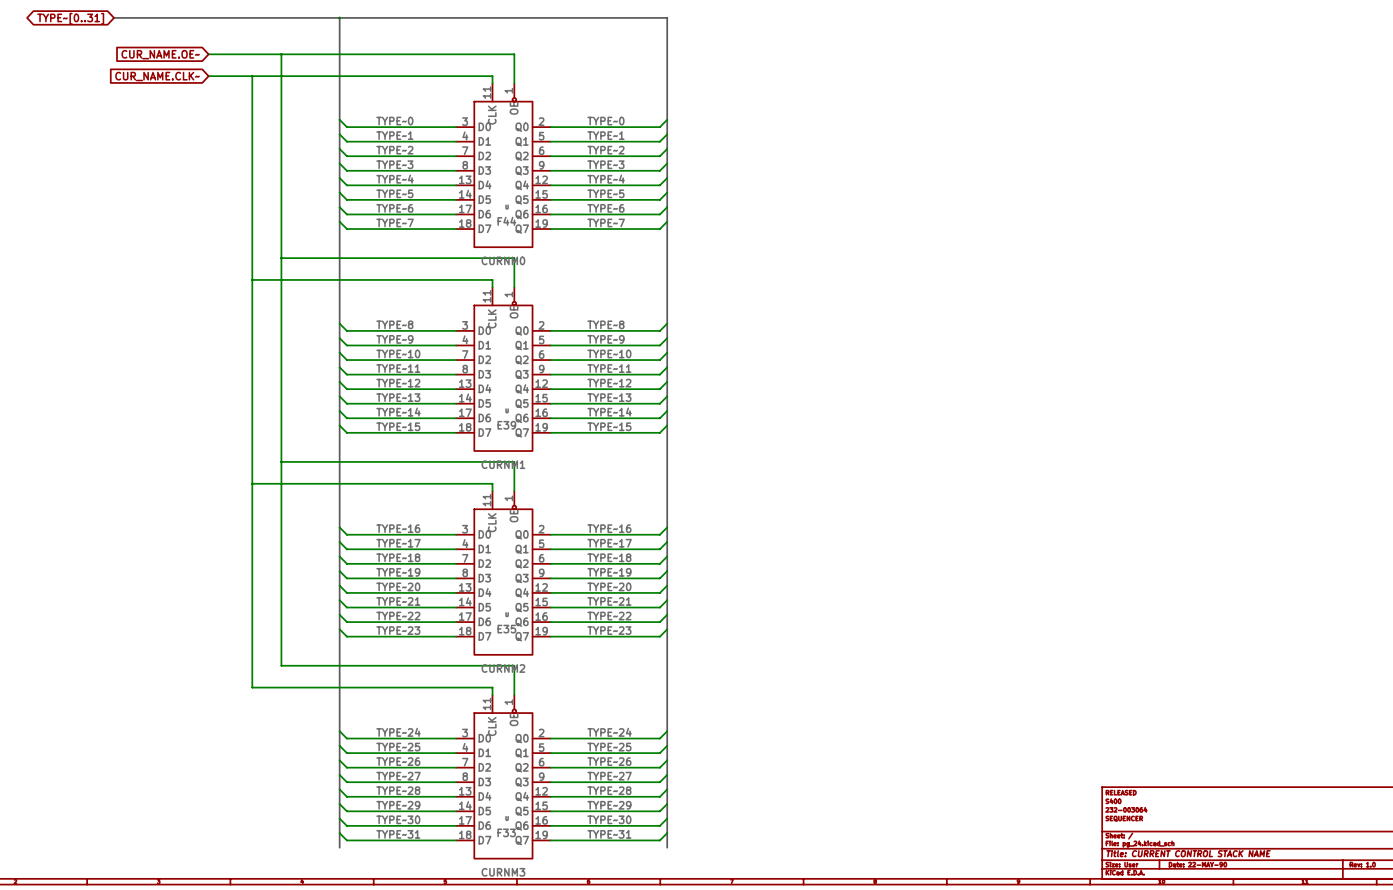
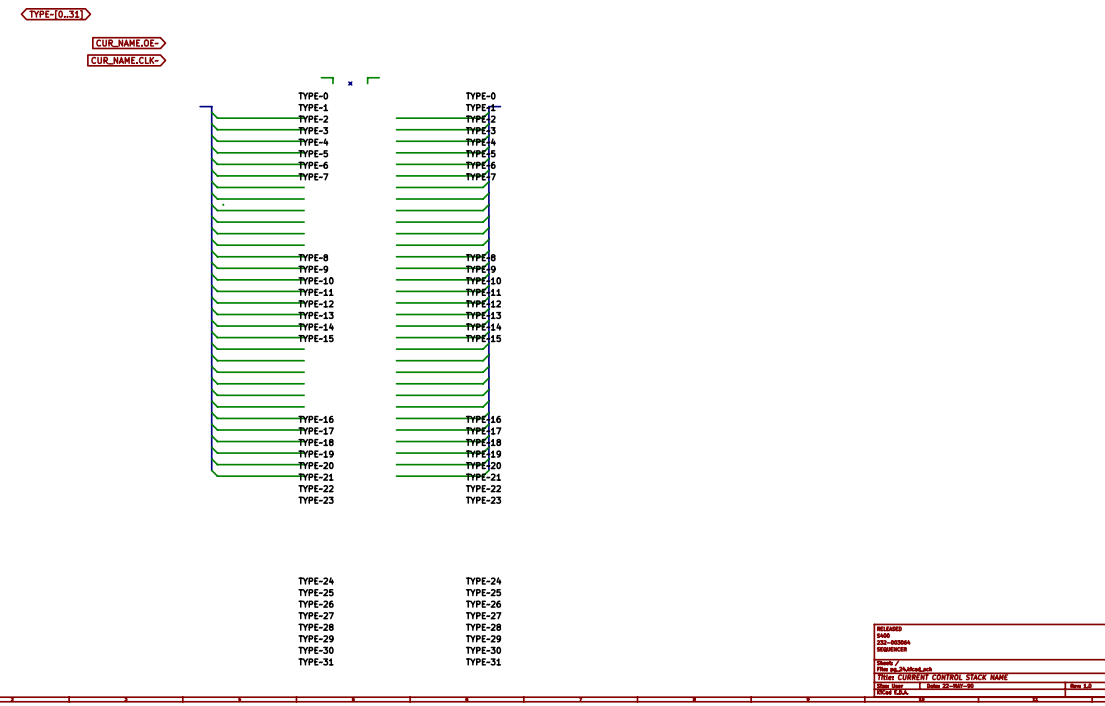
bus: (114, 17) (667, 17) (667, 847) -> none
bus: (339, 17) (339, 847) -> none
junction: (339, 17) -> none
wire: (208, 54) (514, 54) (514, 83) -> none
wire: (281, 54) (281, 665) (514, 665) (514, 694) -> none
wire: (208, 76) (492, 76) (492, 83) -> none
wire: (252, 76) (252, 687) (492, 687) (492, 694) -> none
wire: none -> (321, 77) (332, 77) (332, 83)
wire: none -> (379, 77) (367, 77) (367, 83)
no-connect mark: none -> (350, 83)
wire: (339, 119) (346, 127) (456, 127) -> none
wire: (667, 119) (659, 127) (550, 127) -> none
bus: none -> (200, 106) (211, 106) (211, 470)
wire: (339, 134) (346, 141) (456, 141) -> none
bus: none -> (500, 106) (488, 106) (488, 470)
wire: (667, 134) (659, 141) (550, 141) -> (488, 112) (483, 118) (396, 118)
wire: none -> (211, 112) (217, 118) (304, 118)
wire: (339, 148) (346, 156) (456, 156) -> none
wire: (667, 148) (659, 156) (550, 156) -> (488, 123) (483, 129) (396, 129)
wire: none -> (211, 123) (217, 129) (304, 129)
wire: (339, 163) (346, 170) (456, 170) -> none
wire: (667, 163) (659, 170) (550, 170) -> (488, 135) (483, 141) (396, 141)
part: (503, 165) -> none
wire: none -> (211, 135) (217, 141) (304, 141)
wire: (339, 178) (346, 185) (456, 185) -> none
wire: (667, 178) (659, 185) (550, 185) -> (488, 147) (483, 152) (396, 152)
wire: none -> (211, 147) (217, 152) (304, 152)
wire: (339, 192) (346, 199) (456, 199) -> none
wire: (667, 192) (659, 199) (550, 199) -> (488, 158) (483, 164) (396, 164)
wire: none -> (211, 158) (217, 164) (304, 164)
wire: (339, 207) (346, 214) (456, 214) -> none
wire: (667, 207) (659, 214) (550, 214) -> (488, 170) (483, 175) (396, 175)
wire: none -> (211, 170) (217, 175) (304, 175)
wire: (339, 221) (346, 229) (456, 229) -> none
wire: (667, 221) (659, 229) (550, 229) -> (488, 181) (483, 187) (396, 187)
wire: none -> (211, 181) (217, 187) (304, 187)
wire: none -> (211, 193) (217, 199) (304, 199)
wire: none -> (488, 193) (483, 199) (396, 199)
wire: none -> (211, 204) (217, 210) (304, 210)
wire: (281, 258) (514, 258) (514, 287) -> none
wire: none -> (488, 204) (483, 210) (396, 210)
wire: none -> (488, 216) (483, 222) (396, 222)
wire: (252, 279) (274, 279) -> (211, 216) (217, 222)
wire: (383, 279) (492, 279) (492, 287) -> none
wire: none -> (211, 227) (217, 233) (304, 233)
wire: none -> (488, 227) (483, 233) (396, 233)
wire: none -> (211, 239) (217, 245) (304, 245)
wire: none -> (488, 239) (483, 245) (396, 245)
wire: none -> (211, 250) (217, 256) (304, 256)
wire: (339, 323) (346, 330) (456, 330) -> none
wire: (667, 323) (659, 330) (550, 330) -> (488, 250) (483, 256) (396, 256)
wire: none -> (211, 262) (217, 268) (304, 268)
wire: (339, 338) (346, 345) (456, 345) -> none
wire: (667, 338) (659, 345) (550, 345) -> (488, 262) (483, 268) (396, 268)
wire: none -> (211, 274) (217, 279) (304, 279)
wire: (339, 352) (346, 360) (456, 360) -> none
wire: (667, 352) (659, 360) (550, 360) -> (488, 274) (483, 279) (396, 279)
wire: none -> (211, 285) (217, 291) (304, 291)
wire: (339, 367) (346, 374) (456, 374) -> none
wire: (667, 367) (659, 374) (550, 374) -> (488, 285) (483, 291) (396, 291)
part: (503, 369) -> none
wire: none -> (211, 297) (217, 302) (304, 302)
wire: (339, 381) (346, 389) (456, 389) -> none
wire: (667, 381) (659, 389) (550, 389) -> (488, 297) (483, 302) (396, 302)
wire: none -> (211, 308) (217, 314) (304, 314)
wire: (339, 396) (346, 403) (456, 403) -> none
wire: (667, 396) (659, 403) (550, 403) -> (488, 308) (483, 314) (396, 314)
wire: none -> (211, 320) (217, 326) (304, 326)
wire: (339, 410) (346, 418) (456, 418) -> none
wire: (667, 410) (659, 418) (550, 418) -> (488, 320) (483, 326) (396, 326)
wire: none -> (211, 331) (217, 337) (304, 337)
wire: (339, 425) (346, 432) (456, 432) -> none
wire: (667, 425) (659, 432) (550, 432) -> (488, 331) (483, 337) (396, 337)
wire: none -> (211, 343) (217, 349) (304, 349)
wire: none -> (488, 343) (483, 349) (396, 349)
wire: none -> (211, 354) (217, 360) (304, 360)
wire: none -> (488, 354) (483, 360) (396, 360)
wire: none -> (211, 366) (217, 372) (304, 372)
wire: (281, 461) (514, 461) (514, 491) -> none
wire: none -> (488, 366) (483, 372) (396, 372)
wire: none -> (488, 378) (483, 383) (396, 383)
wire: (252, 483) (274, 483) -> (211, 378) (217, 383)
wire: (383, 483) (492, 483) (492, 491) -> none
wire: none -> (211, 389) (217, 395) (304, 395)
wire: none -> (488, 389) (483, 395) (396, 395)
wire: none -> (211, 401) (217, 406) (304, 406)
wire: none -> (488, 401) (483, 406) (396, 406)
wire: none -> (211, 412) (217, 418) (304, 418)
wire: (339, 527) (346, 534) (456, 534) -> none
wire: (667, 527) (659, 534) (550, 534) -> (488, 412) (483, 418) (396, 418)
wire: none -> (211, 424) (217, 429) (304, 429)
wire: (339, 542) (346, 549) (456, 549) -> none
wire: (667, 542) (659, 549) (550, 549) -> (488, 424) (483, 429) (396, 429)
wire: none -> (211, 435) (217, 441) (304, 441)
wire: (339, 556) (346, 563) (456, 563) -> none
wire: (667, 556) (659, 563) (550, 563) -> (488, 435) (483, 441) (396, 441)
wire: none -> (211, 447) (217, 453) (304, 453)
wire: (339, 571) (346, 578) (456, 578) -> none
wire: (667, 571) (659, 578) (550, 578) -> (488, 447) (483, 453) (396, 453)
part: (503, 572) -> none
wire: none -> (211, 458) (217, 464) (304, 464)
wire: (339, 585) (346, 592) (456, 592) -> none
wire: (667, 585) (659, 592) (550, 592) -> (488, 458) (483, 464) (396, 464)
wire: none -> (211, 470) (217, 476) (304, 476)
wire: (339, 600) (346, 607) (456, 607) -> none
wire: (667, 600) (659, 607) (550, 607) -> (488, 470) (483, 476) (396, 476)
wire: (339, 614) (346, 622) (456, 622) -> none
wire: (667, 614) (659, 622) (550, 622) -> none
wire: (339, 629) (346, 636) (456, 636) -> none
wire: (667, 629) (659, 636) (550, 636) -> none
wire: (339, 731) (346, 738) (456, 738) -> none
wire: (667, 731) (659, 738) (550, 738) -> none
wire: (339, 745) (346, 753) (456, 753) -> none
wire: (667, 745) (659, 753) (550, 753) -> none
wire: (339, 760) (346, 767) (456, 767) -> none
wire: (667, 760) (659, 767) (550, 767) -> none
wire: (339, 774) (346, 782) (456, 782) -> none
wire: (667, 774) (659, 782) (550, 782) -> none
part: (503, 776) -> none
wire: (339, 789) (346, 796) (456, 796) -> none
wire: (667, 789) (659, 796) (550, 796) -> none
wire: (339, 804) (346, 811) (456, 811) -> none
wire: (667, 804) (659, 811) (550, 811) -> none
wire: (339, 818) (346, 825) (456, 825) -> none
wire: (667, 818) (659, 825) (550, 825) -> none
wire: (339, 833) (346, 840) (456, 840) -> none
wire: (667, 833) (659, 840) (550, 840) -> none

